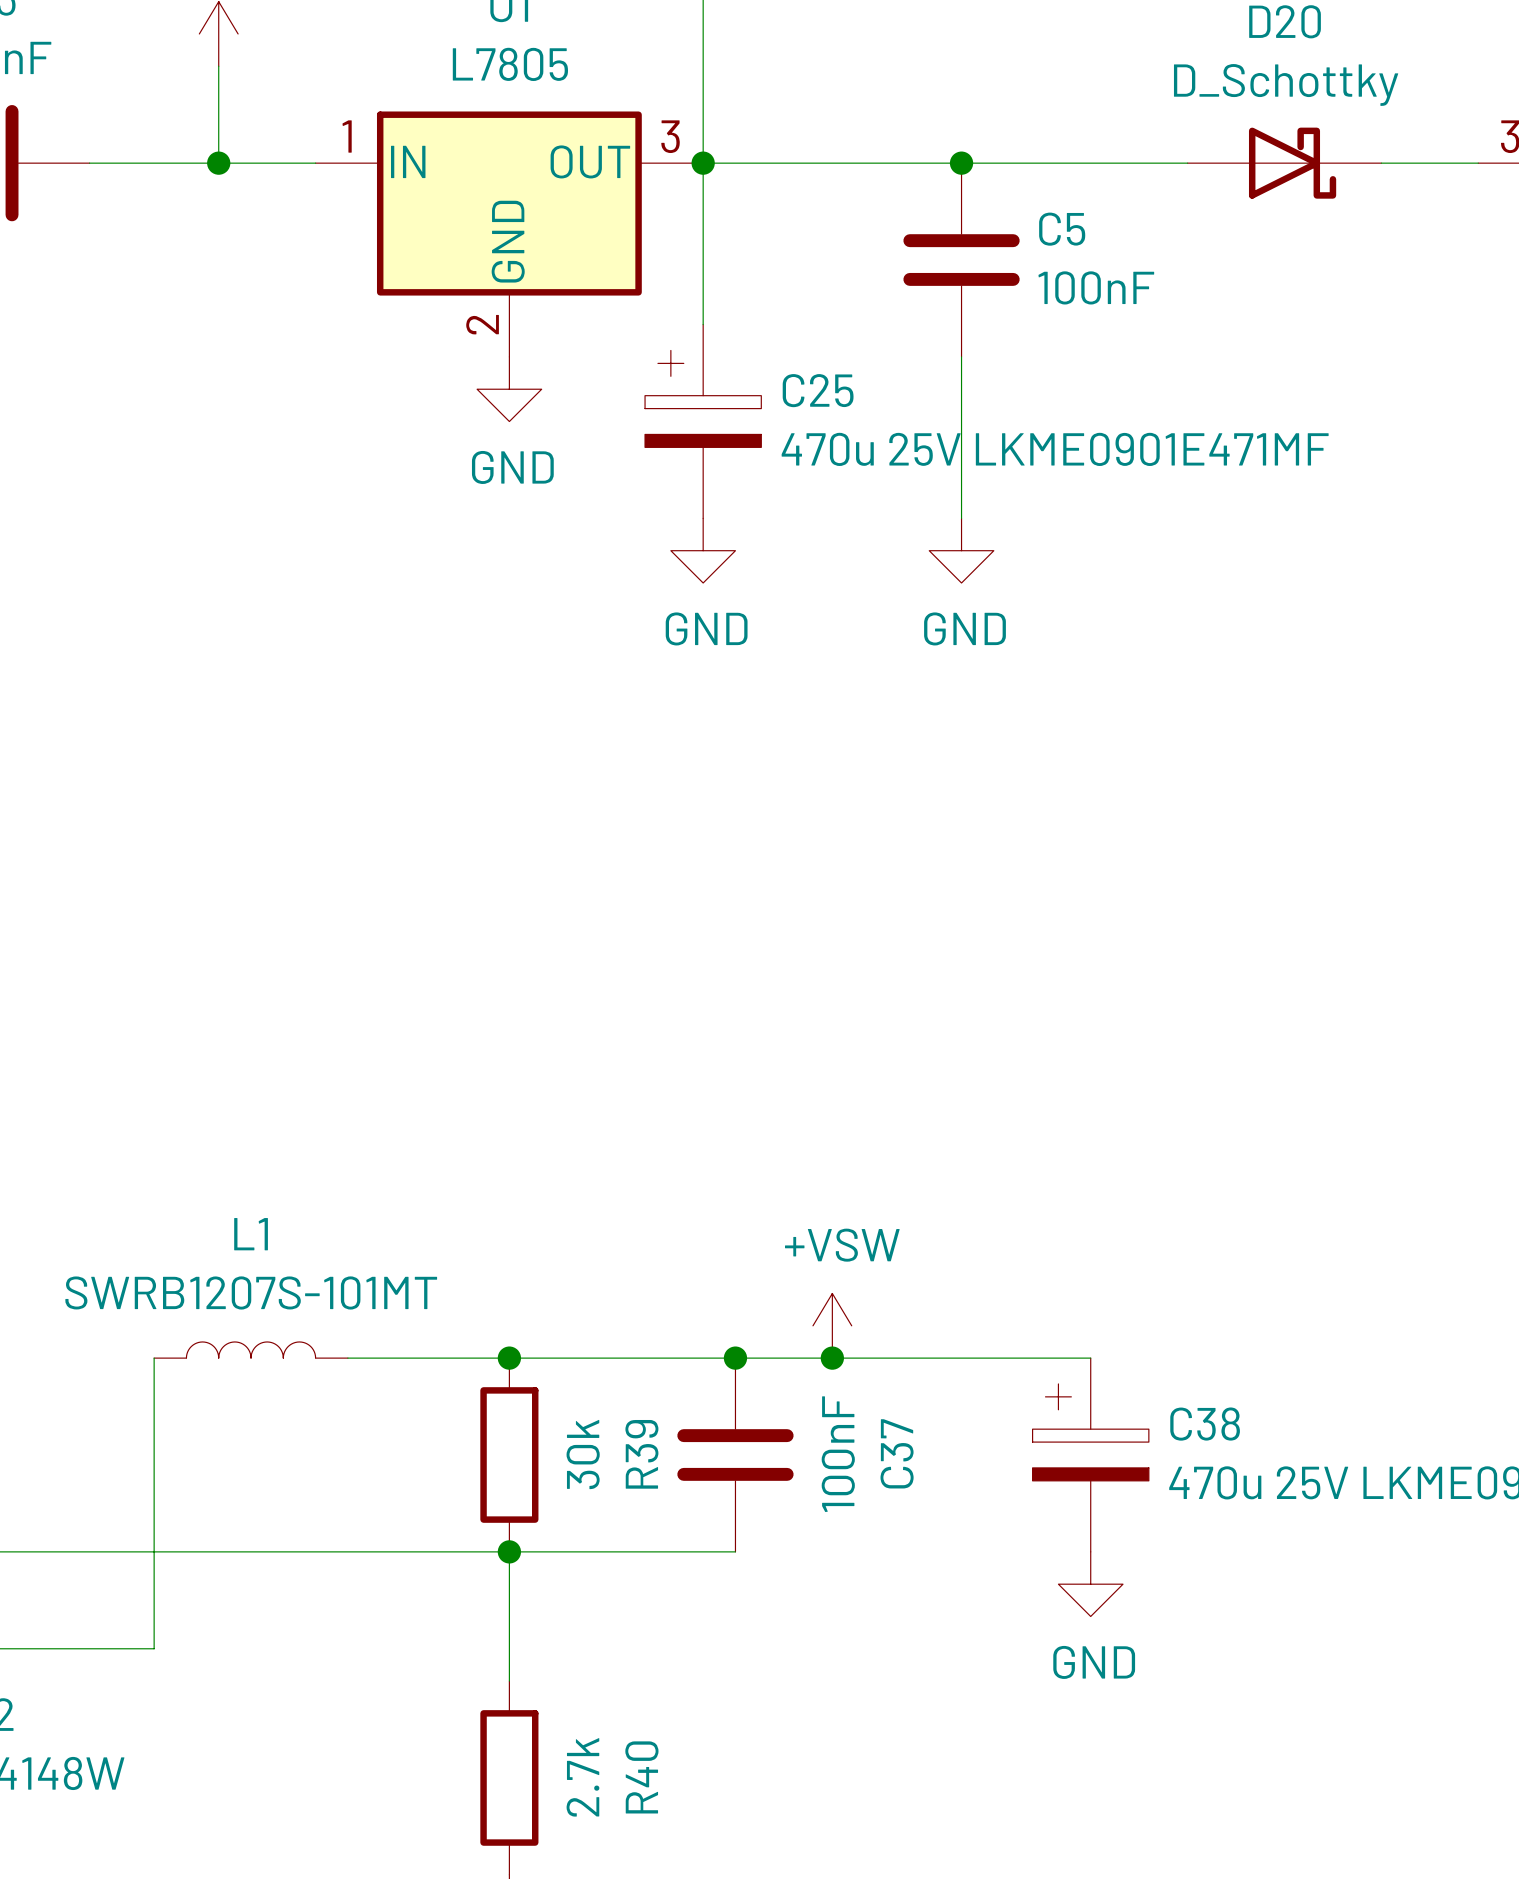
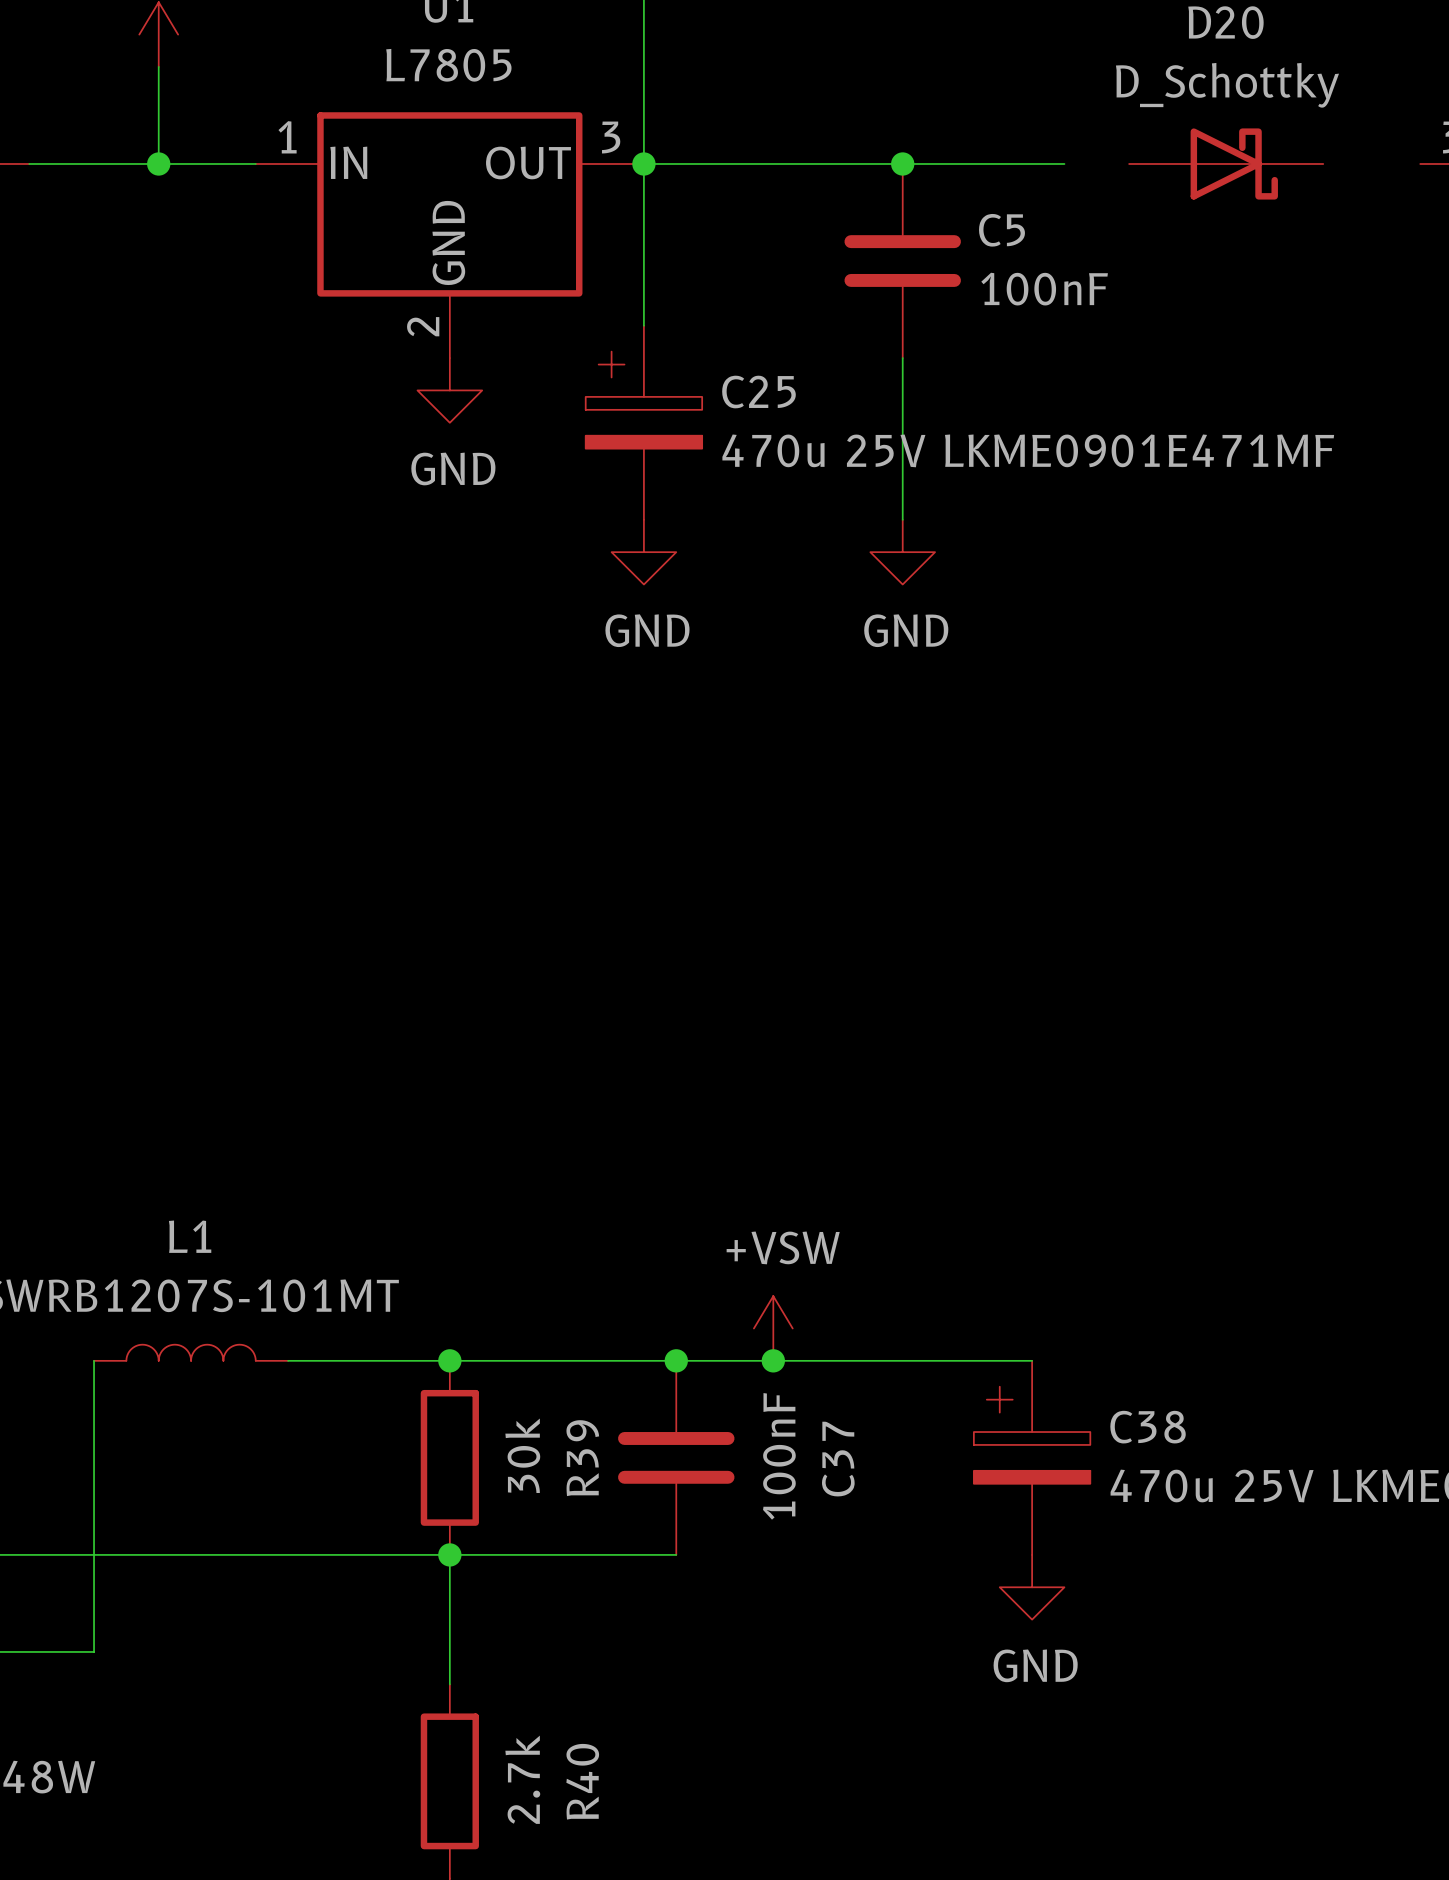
wire: (1123, 163) (1187, 163) -> none
wire: (1381, 163) (1478, 163) -> none

